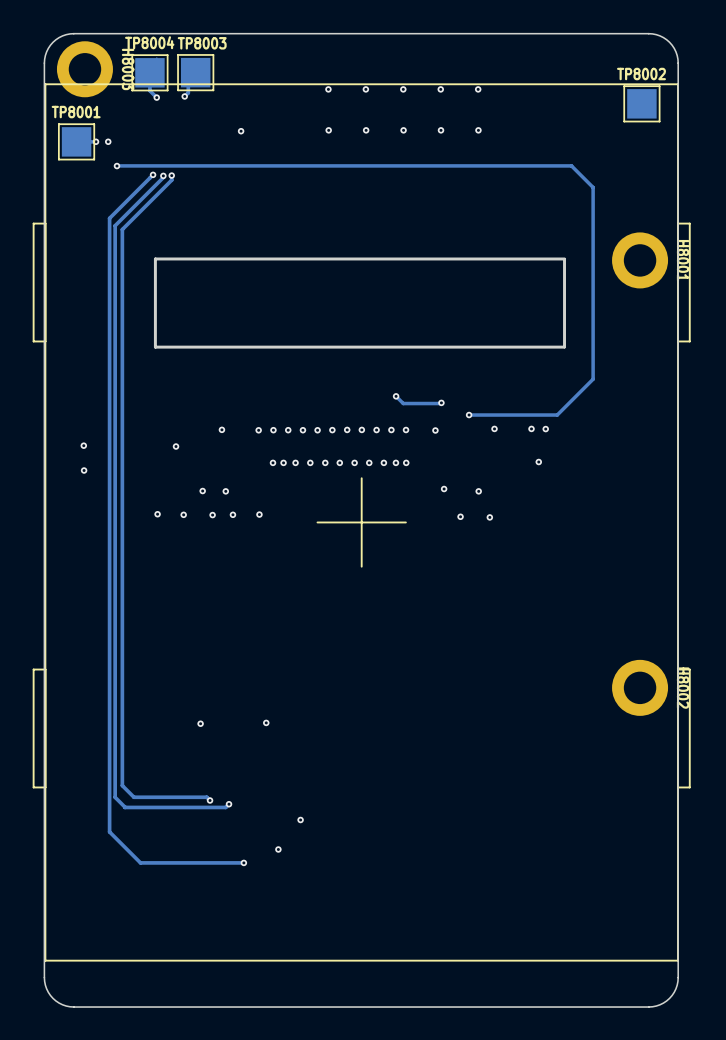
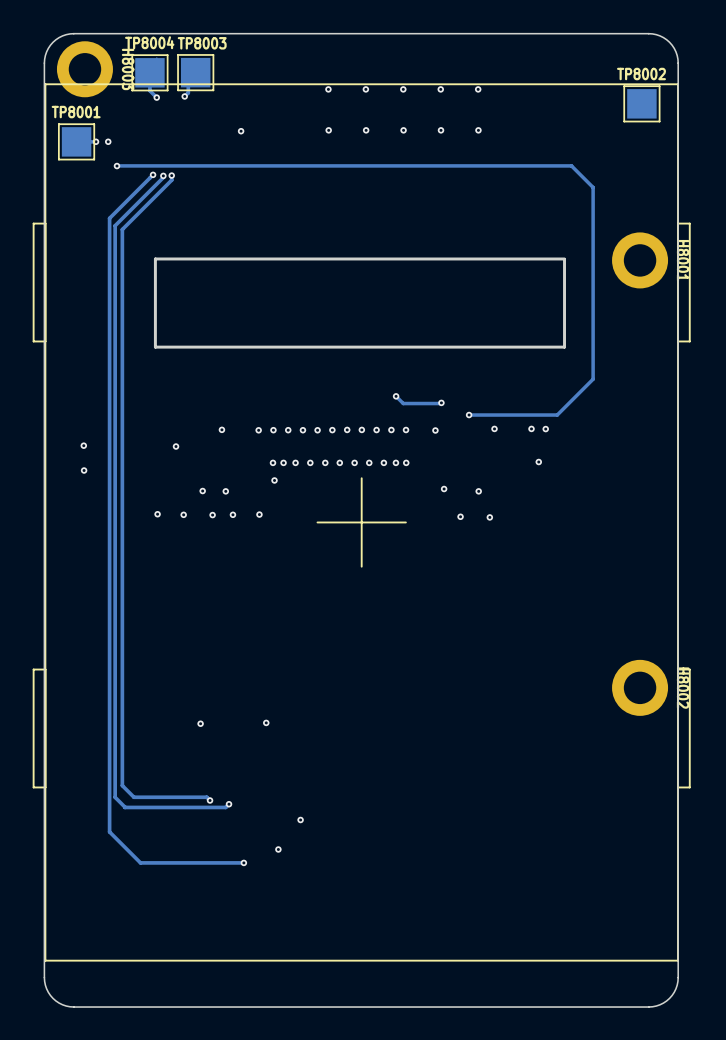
via: none -> (274, 480)

